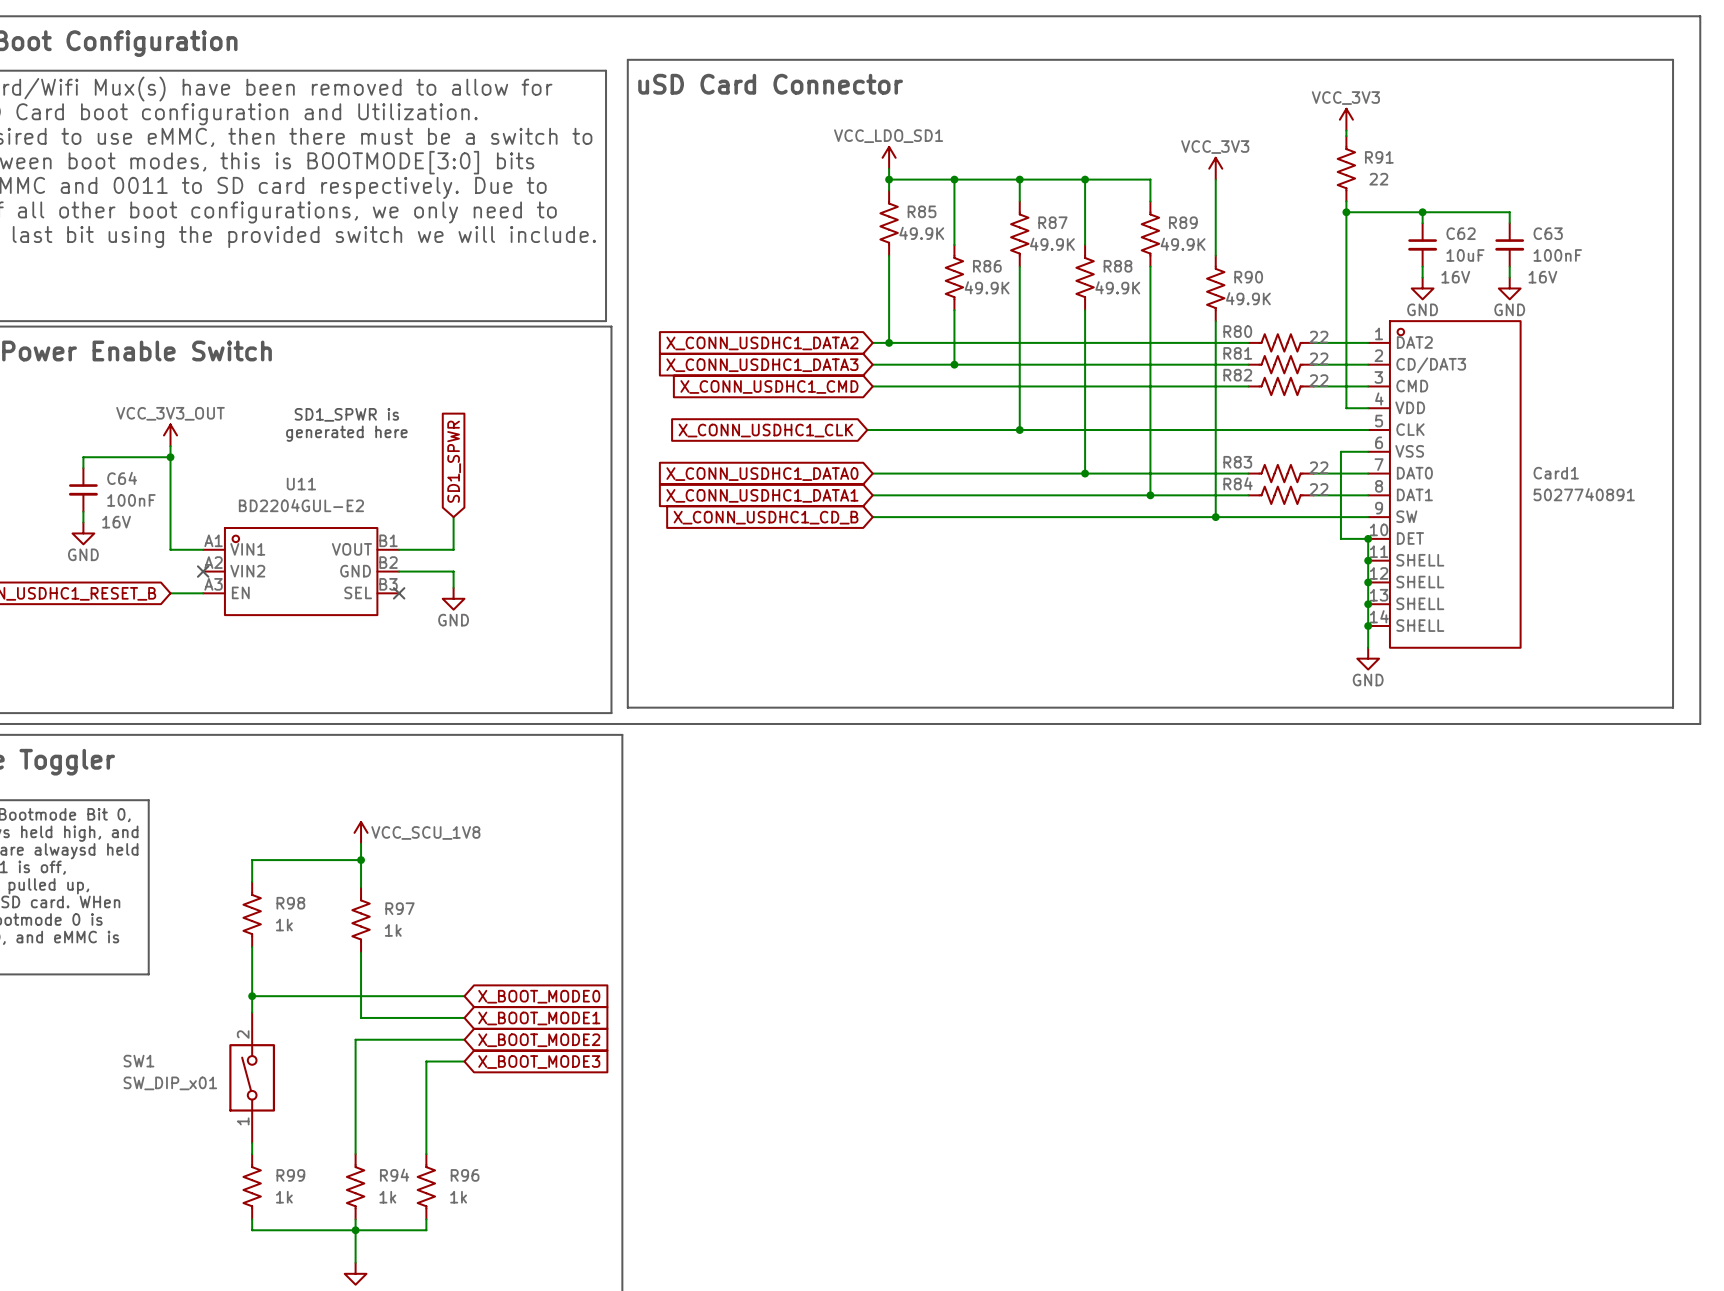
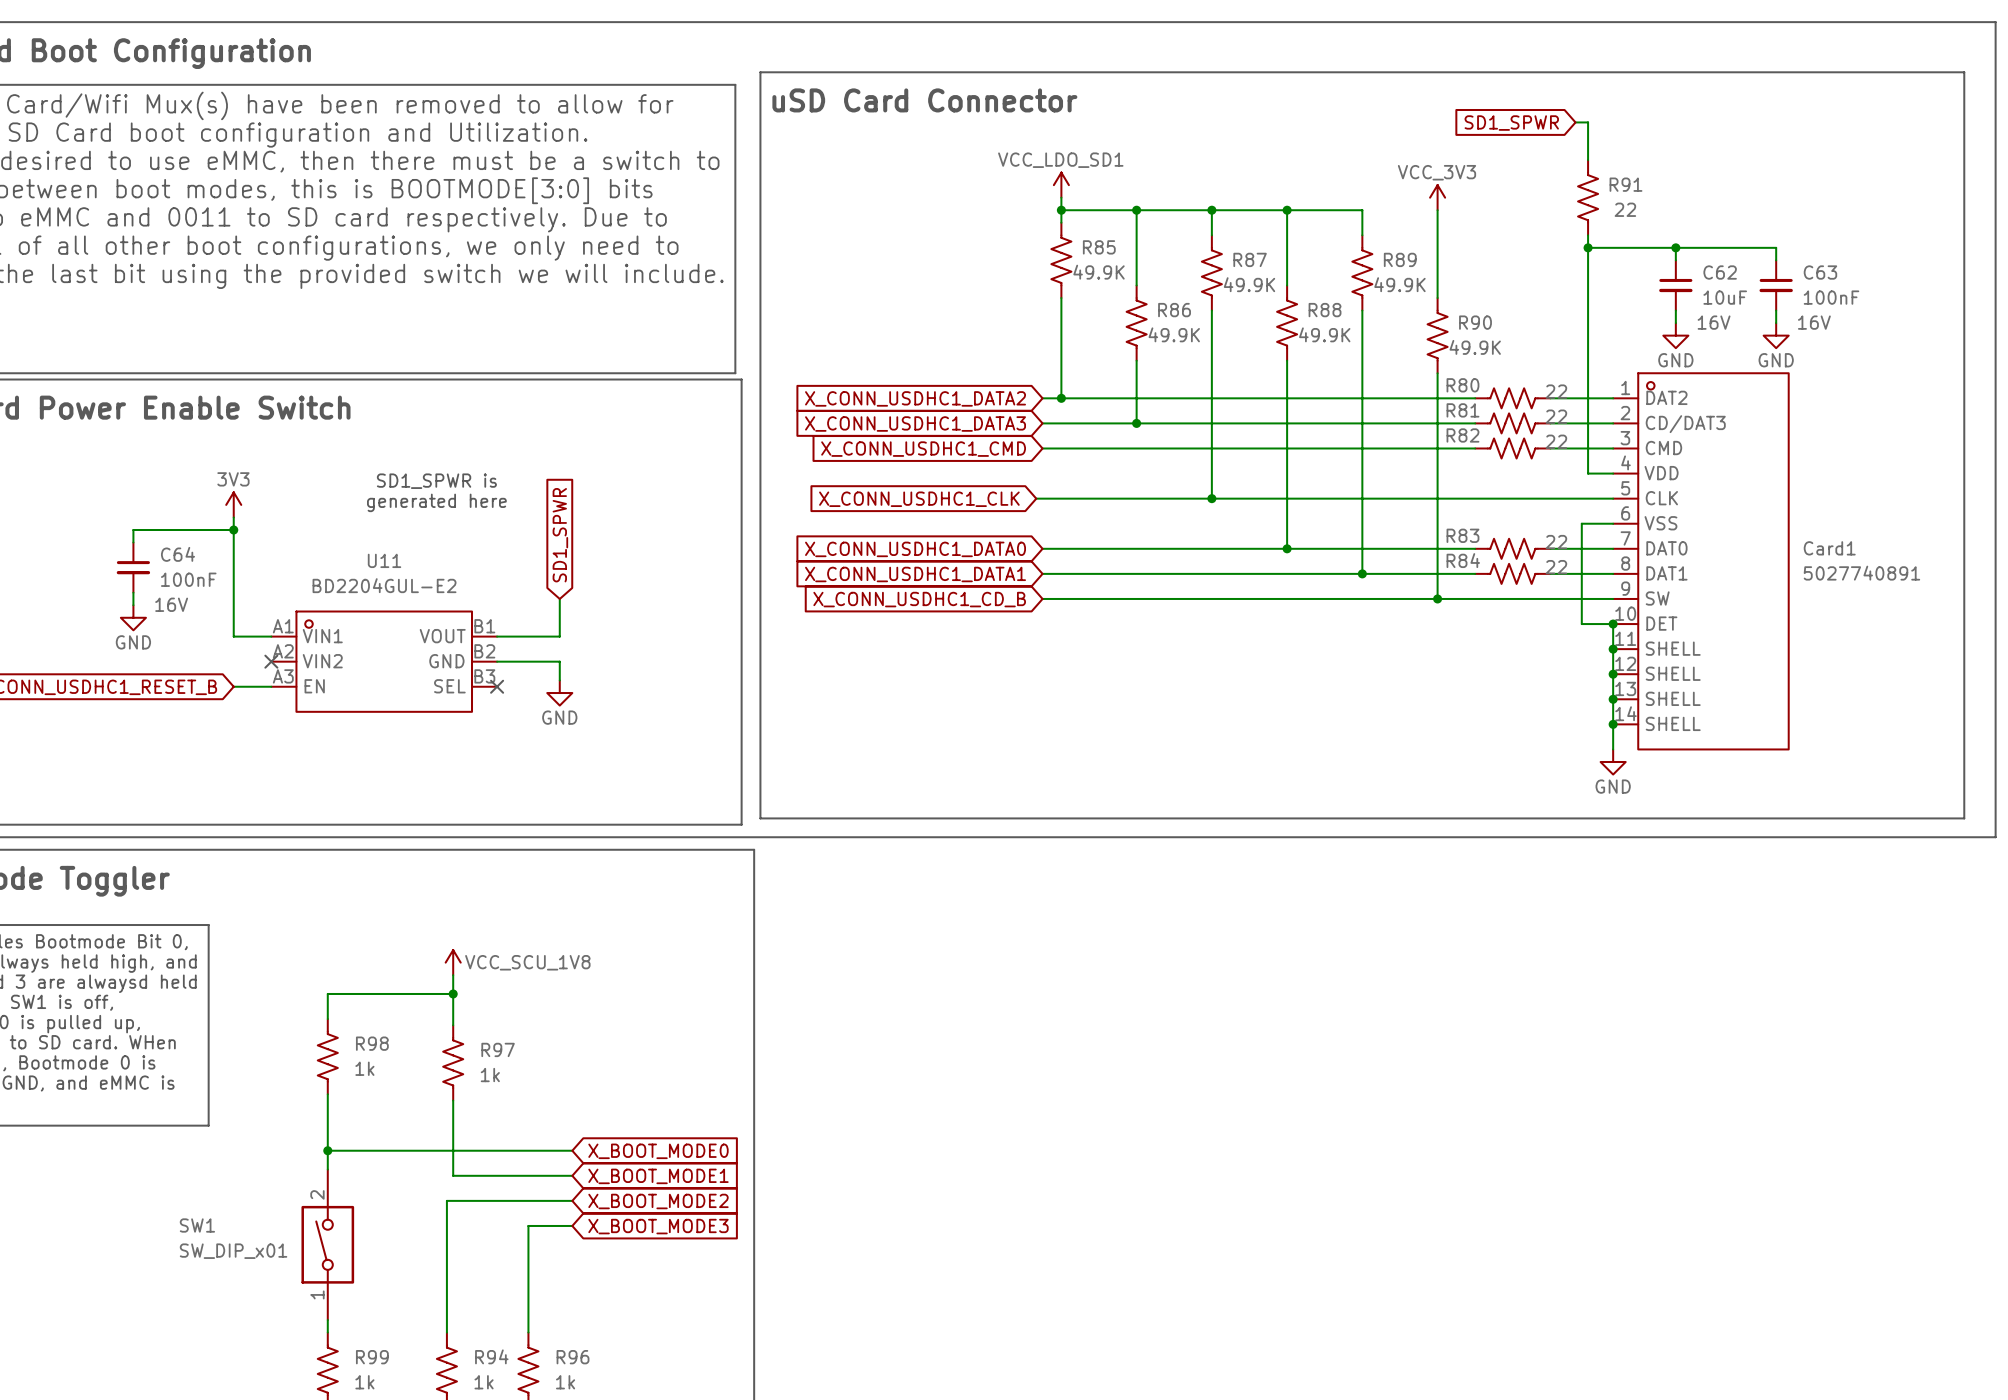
global label: none -> SD1_SPWR (1511, 123)
power symbol: VCC_3V3 (1346, 119) -> none
power symbol: VCC_3V3_OUT (170, 435) -> 3V3 (233, 504)

